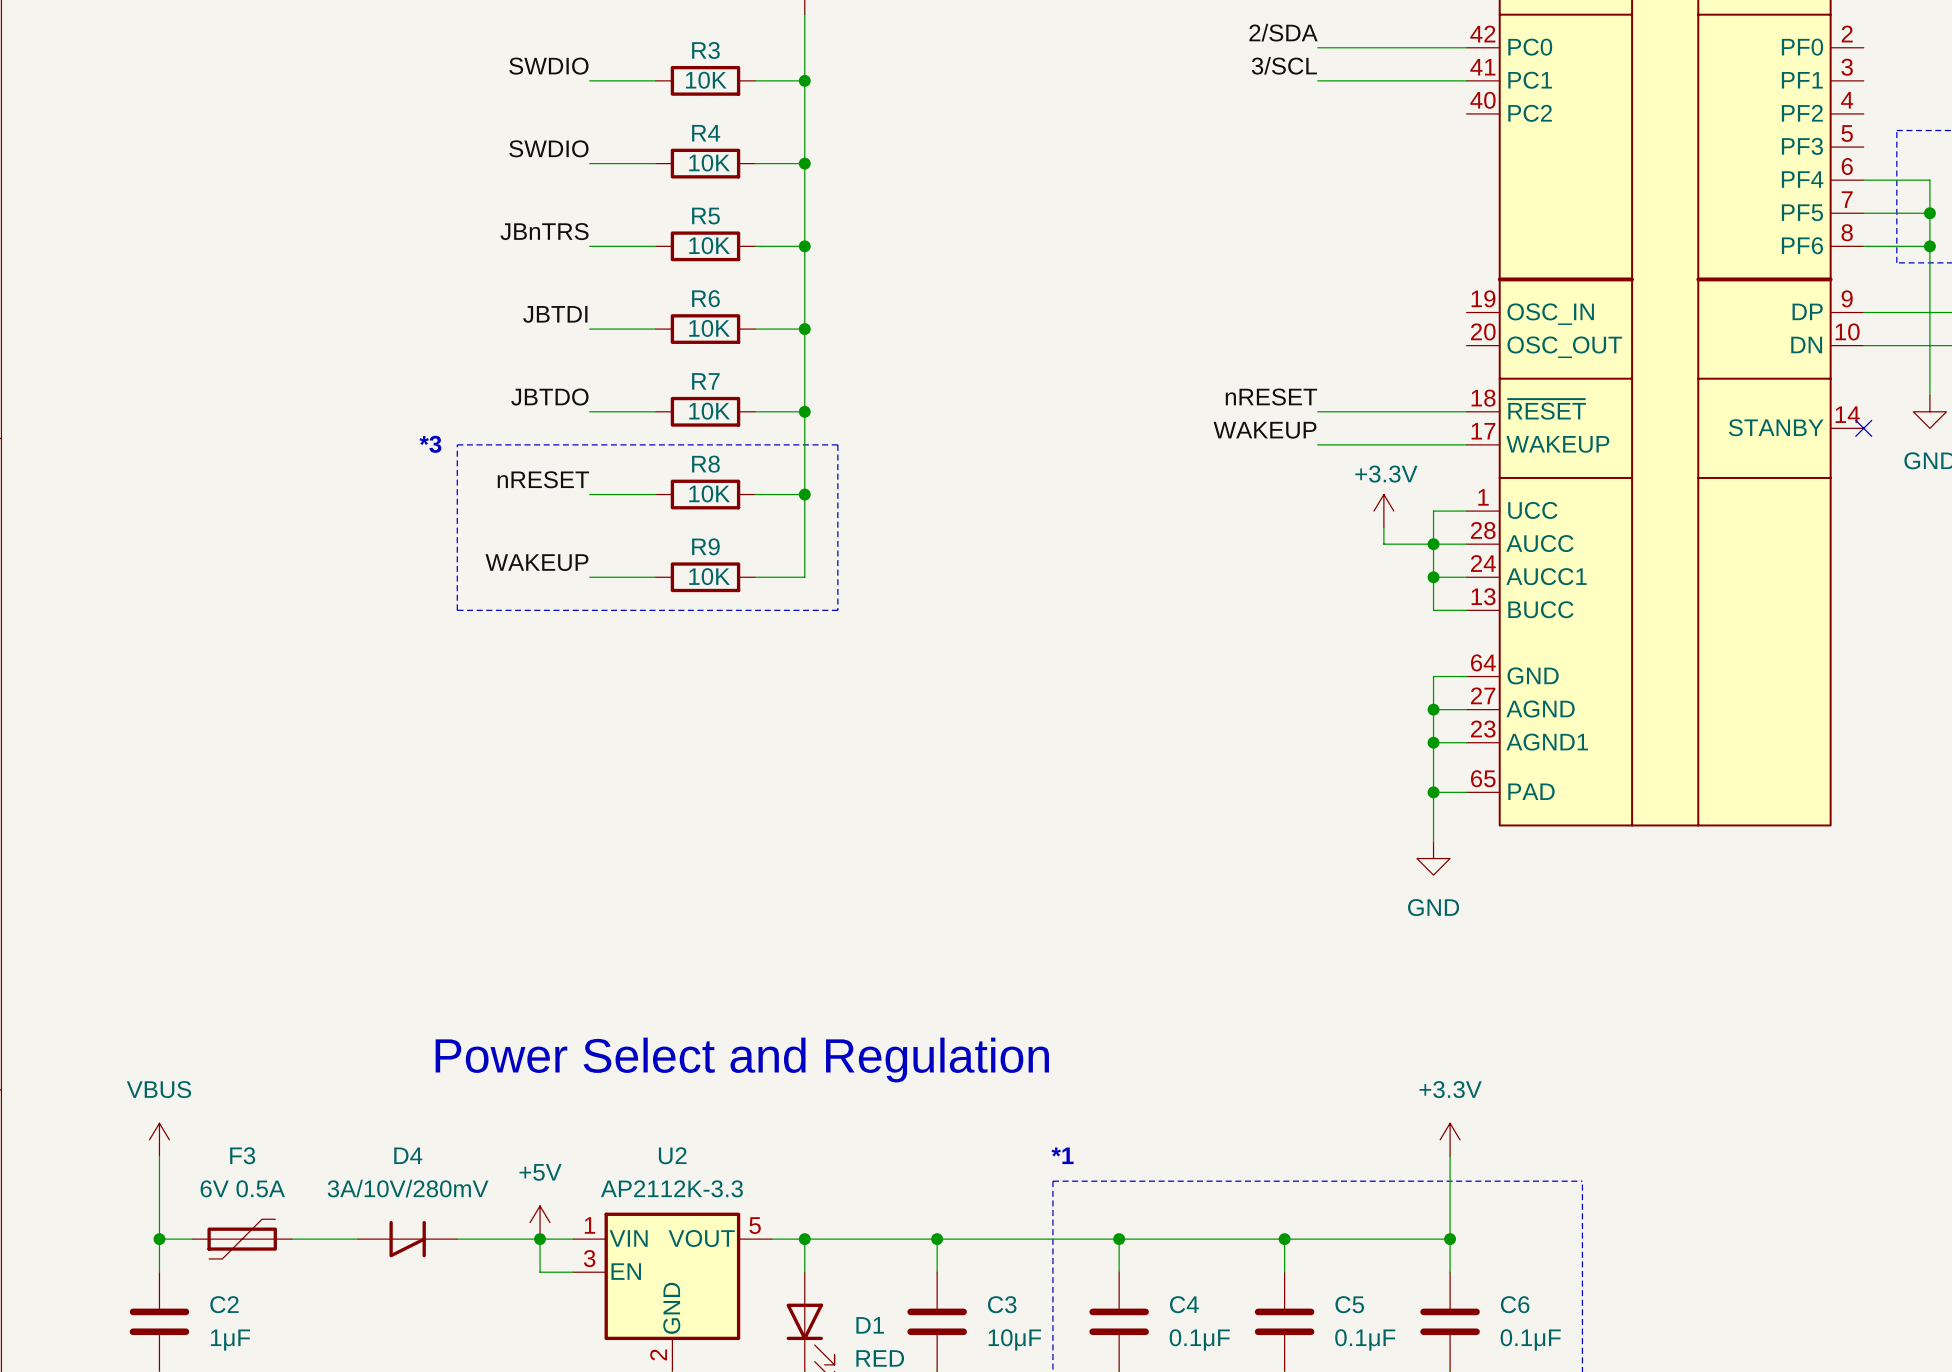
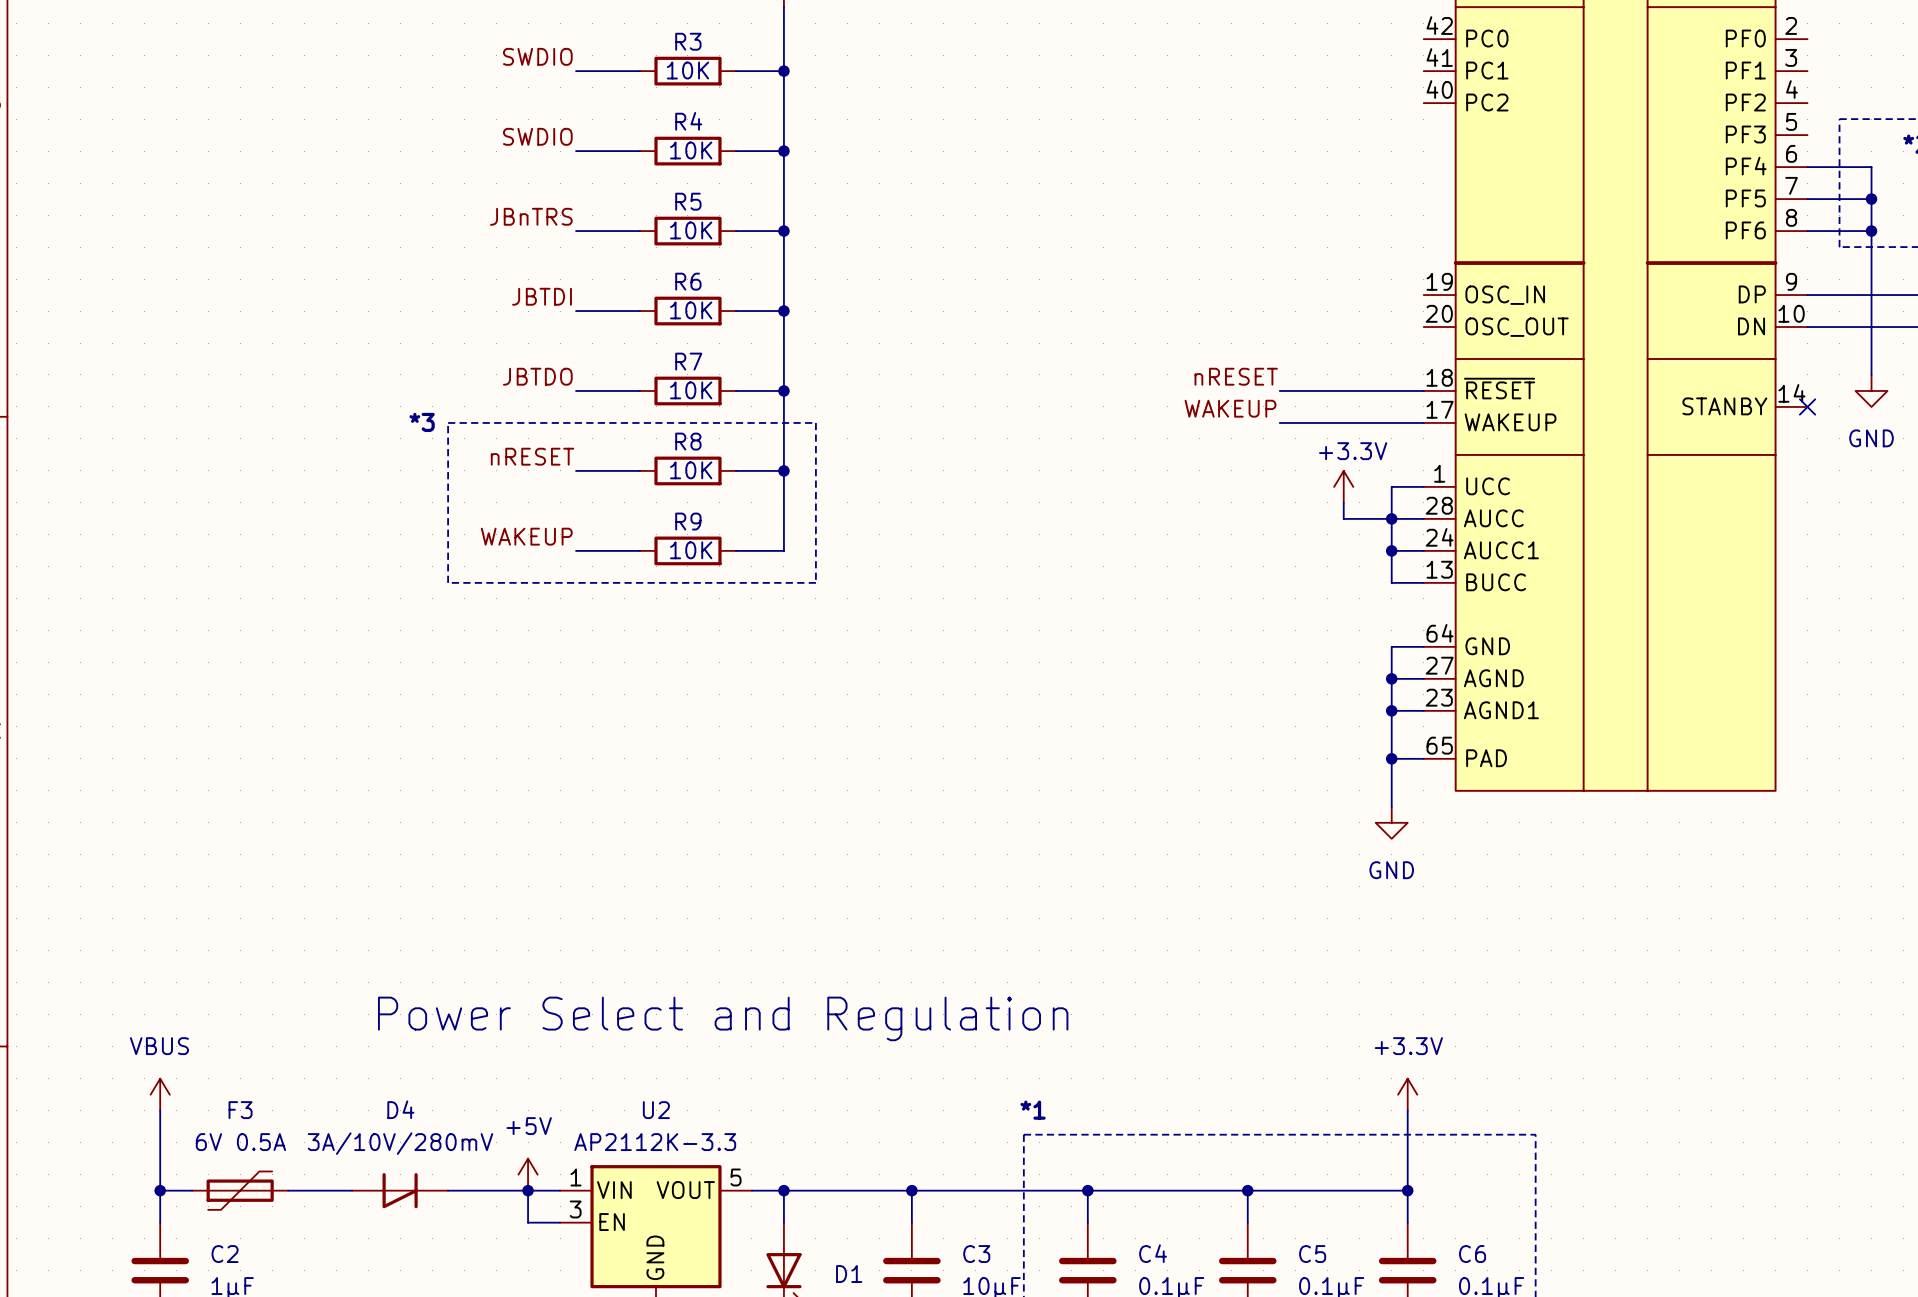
label: 2/SDA (1283, 32) -> none
wire: (1317, 47) (1466, 47) -> none
label: 3/SCL (1284, 65) -> none
wire: (1317, 80) (1466, 80) -> none

